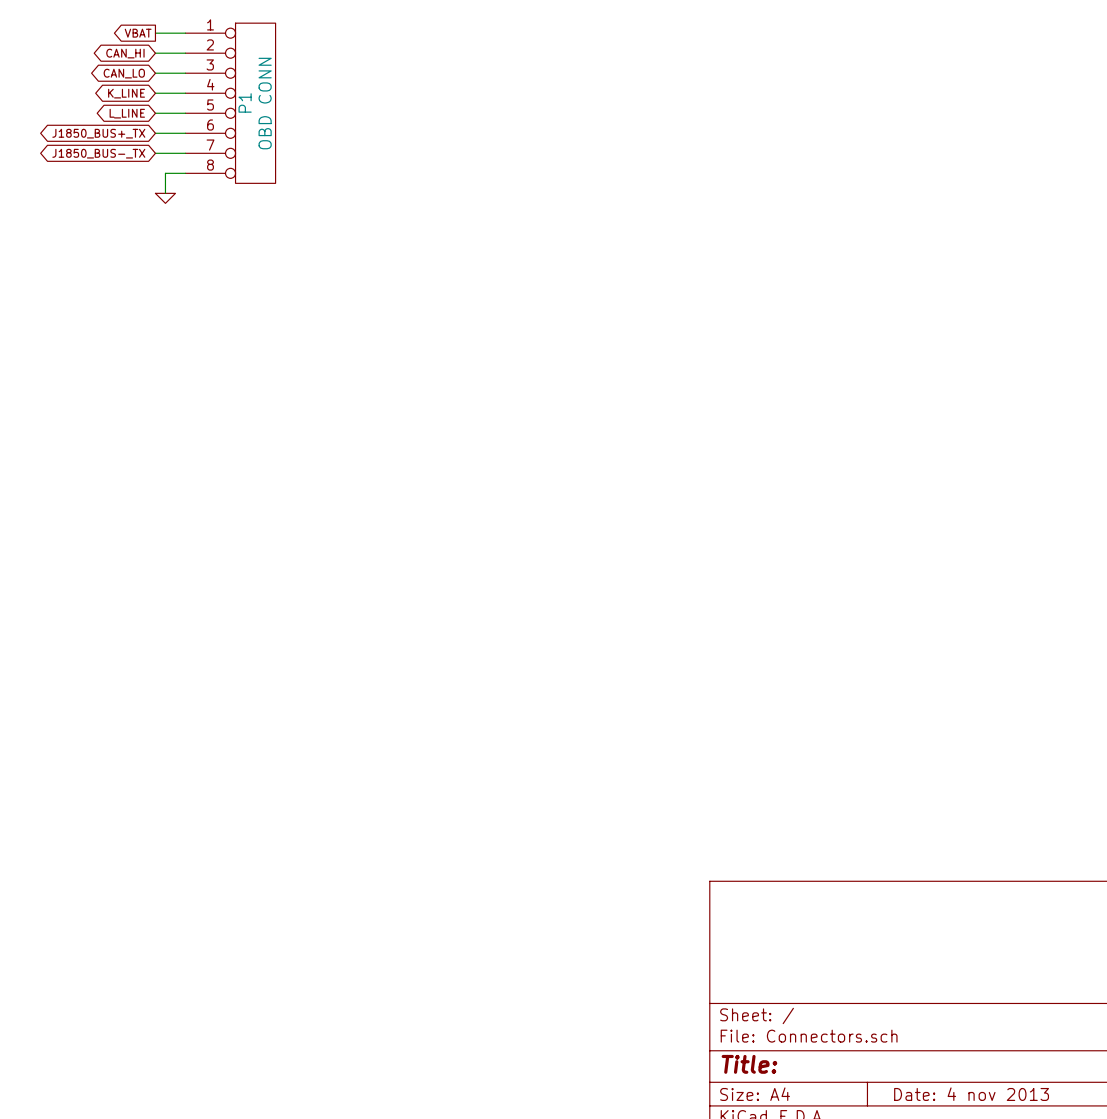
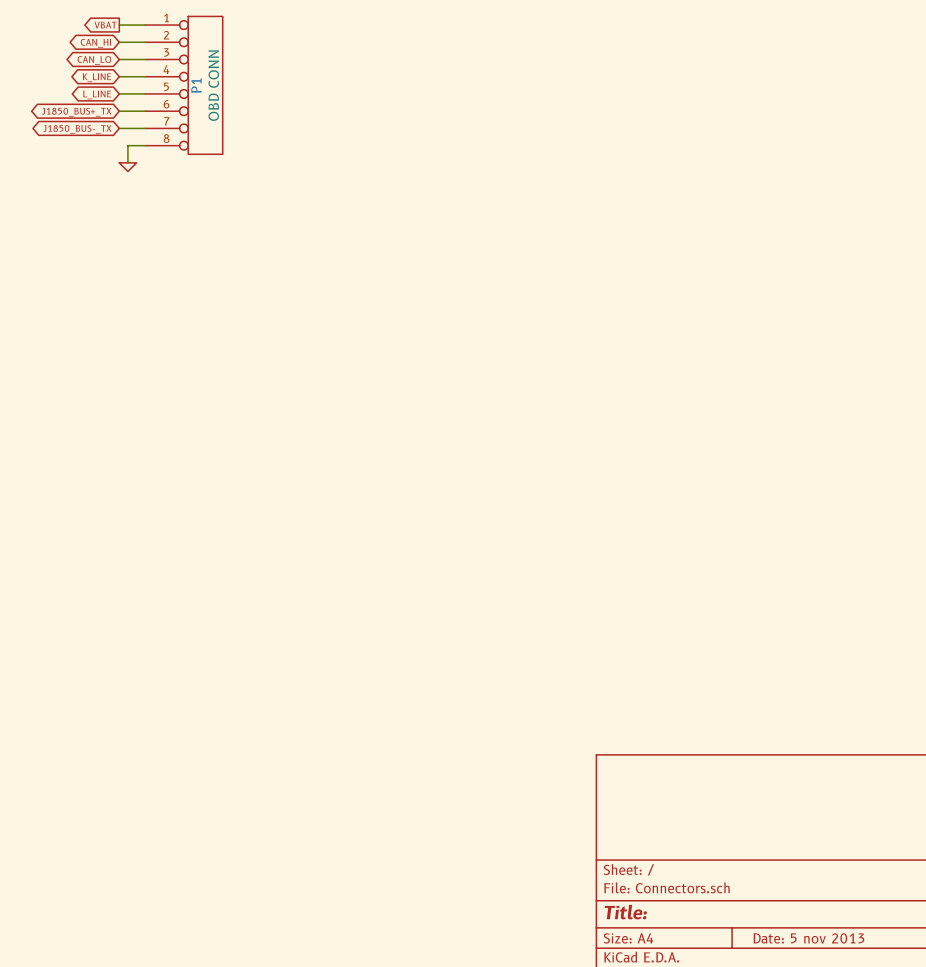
title block: Date: 4 nov 2013 (971, 1094) -> Date: 5 nov 2013 (808, 938)

